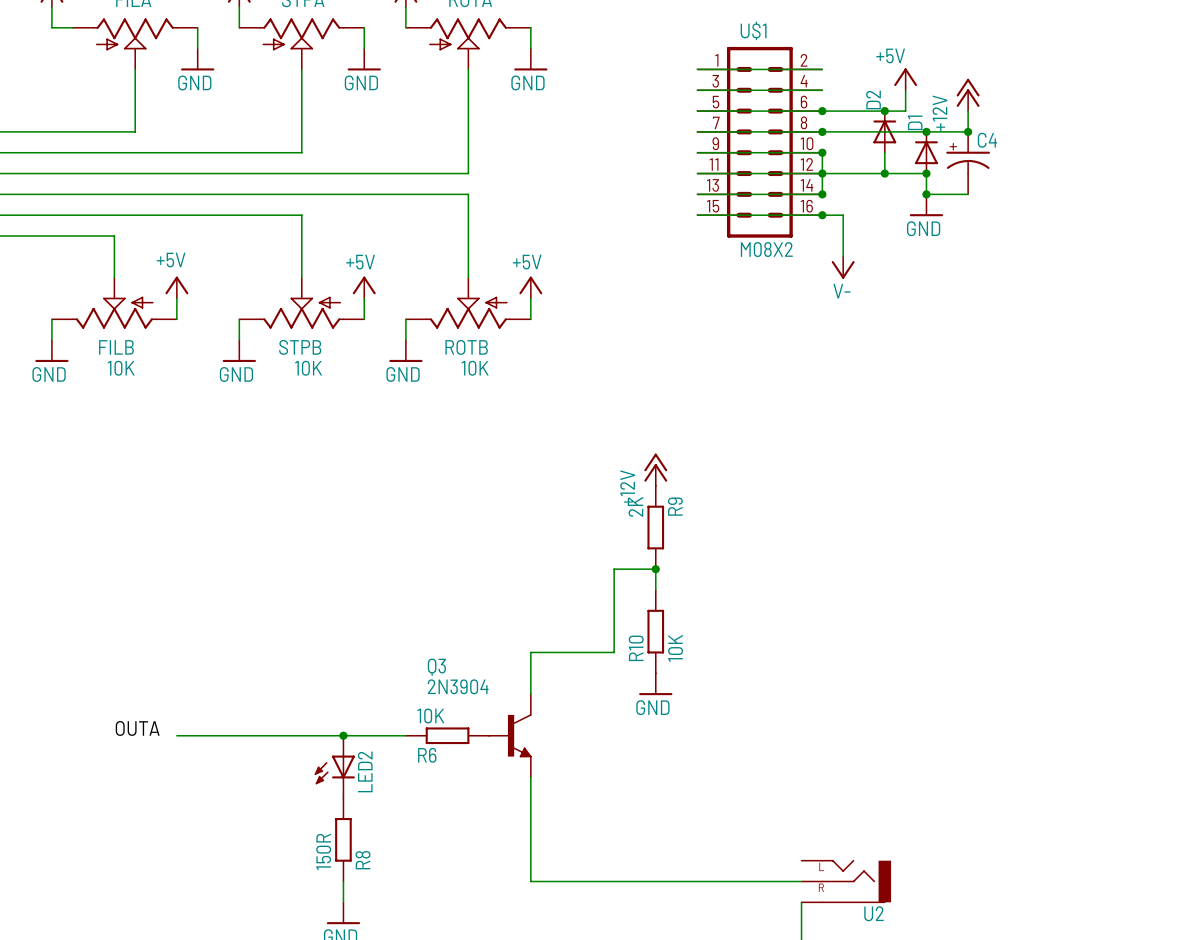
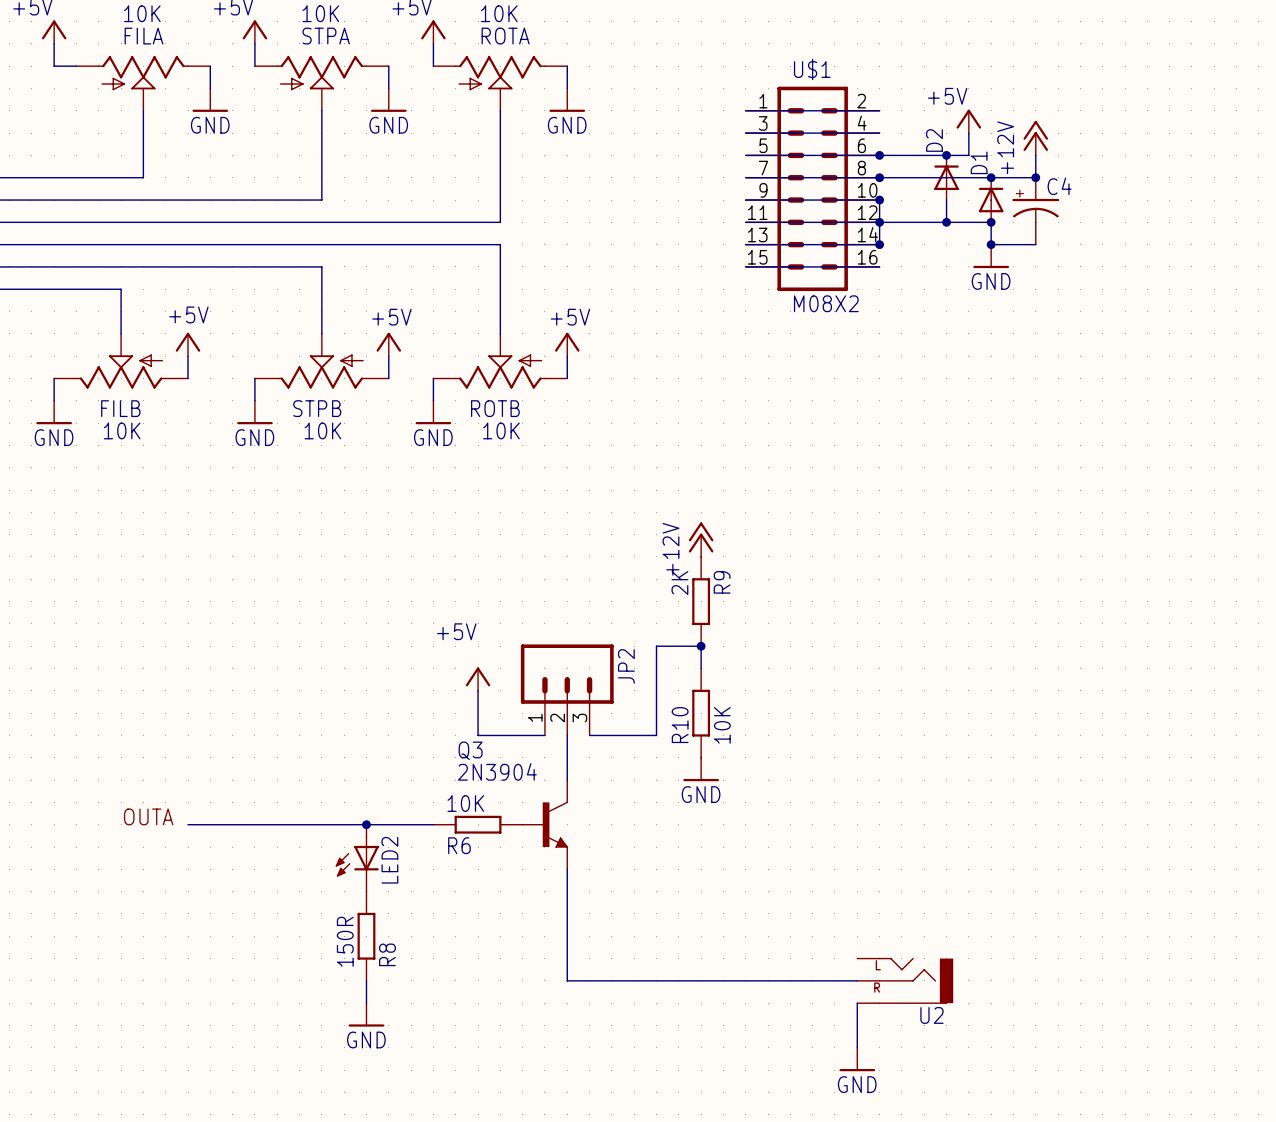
wire: (822, 215) (843, 215) (843, 256) -> none
junction: (822, 215) -> none
power symbol: V- (843, 267) -> none
power symbol: none -> +5V (478, 679)
JP2: none -> (567, 689)
wire: none -> (478, 690) (478, 735) (544, 735)
wire: (530, 652) (551, 652) -> none

